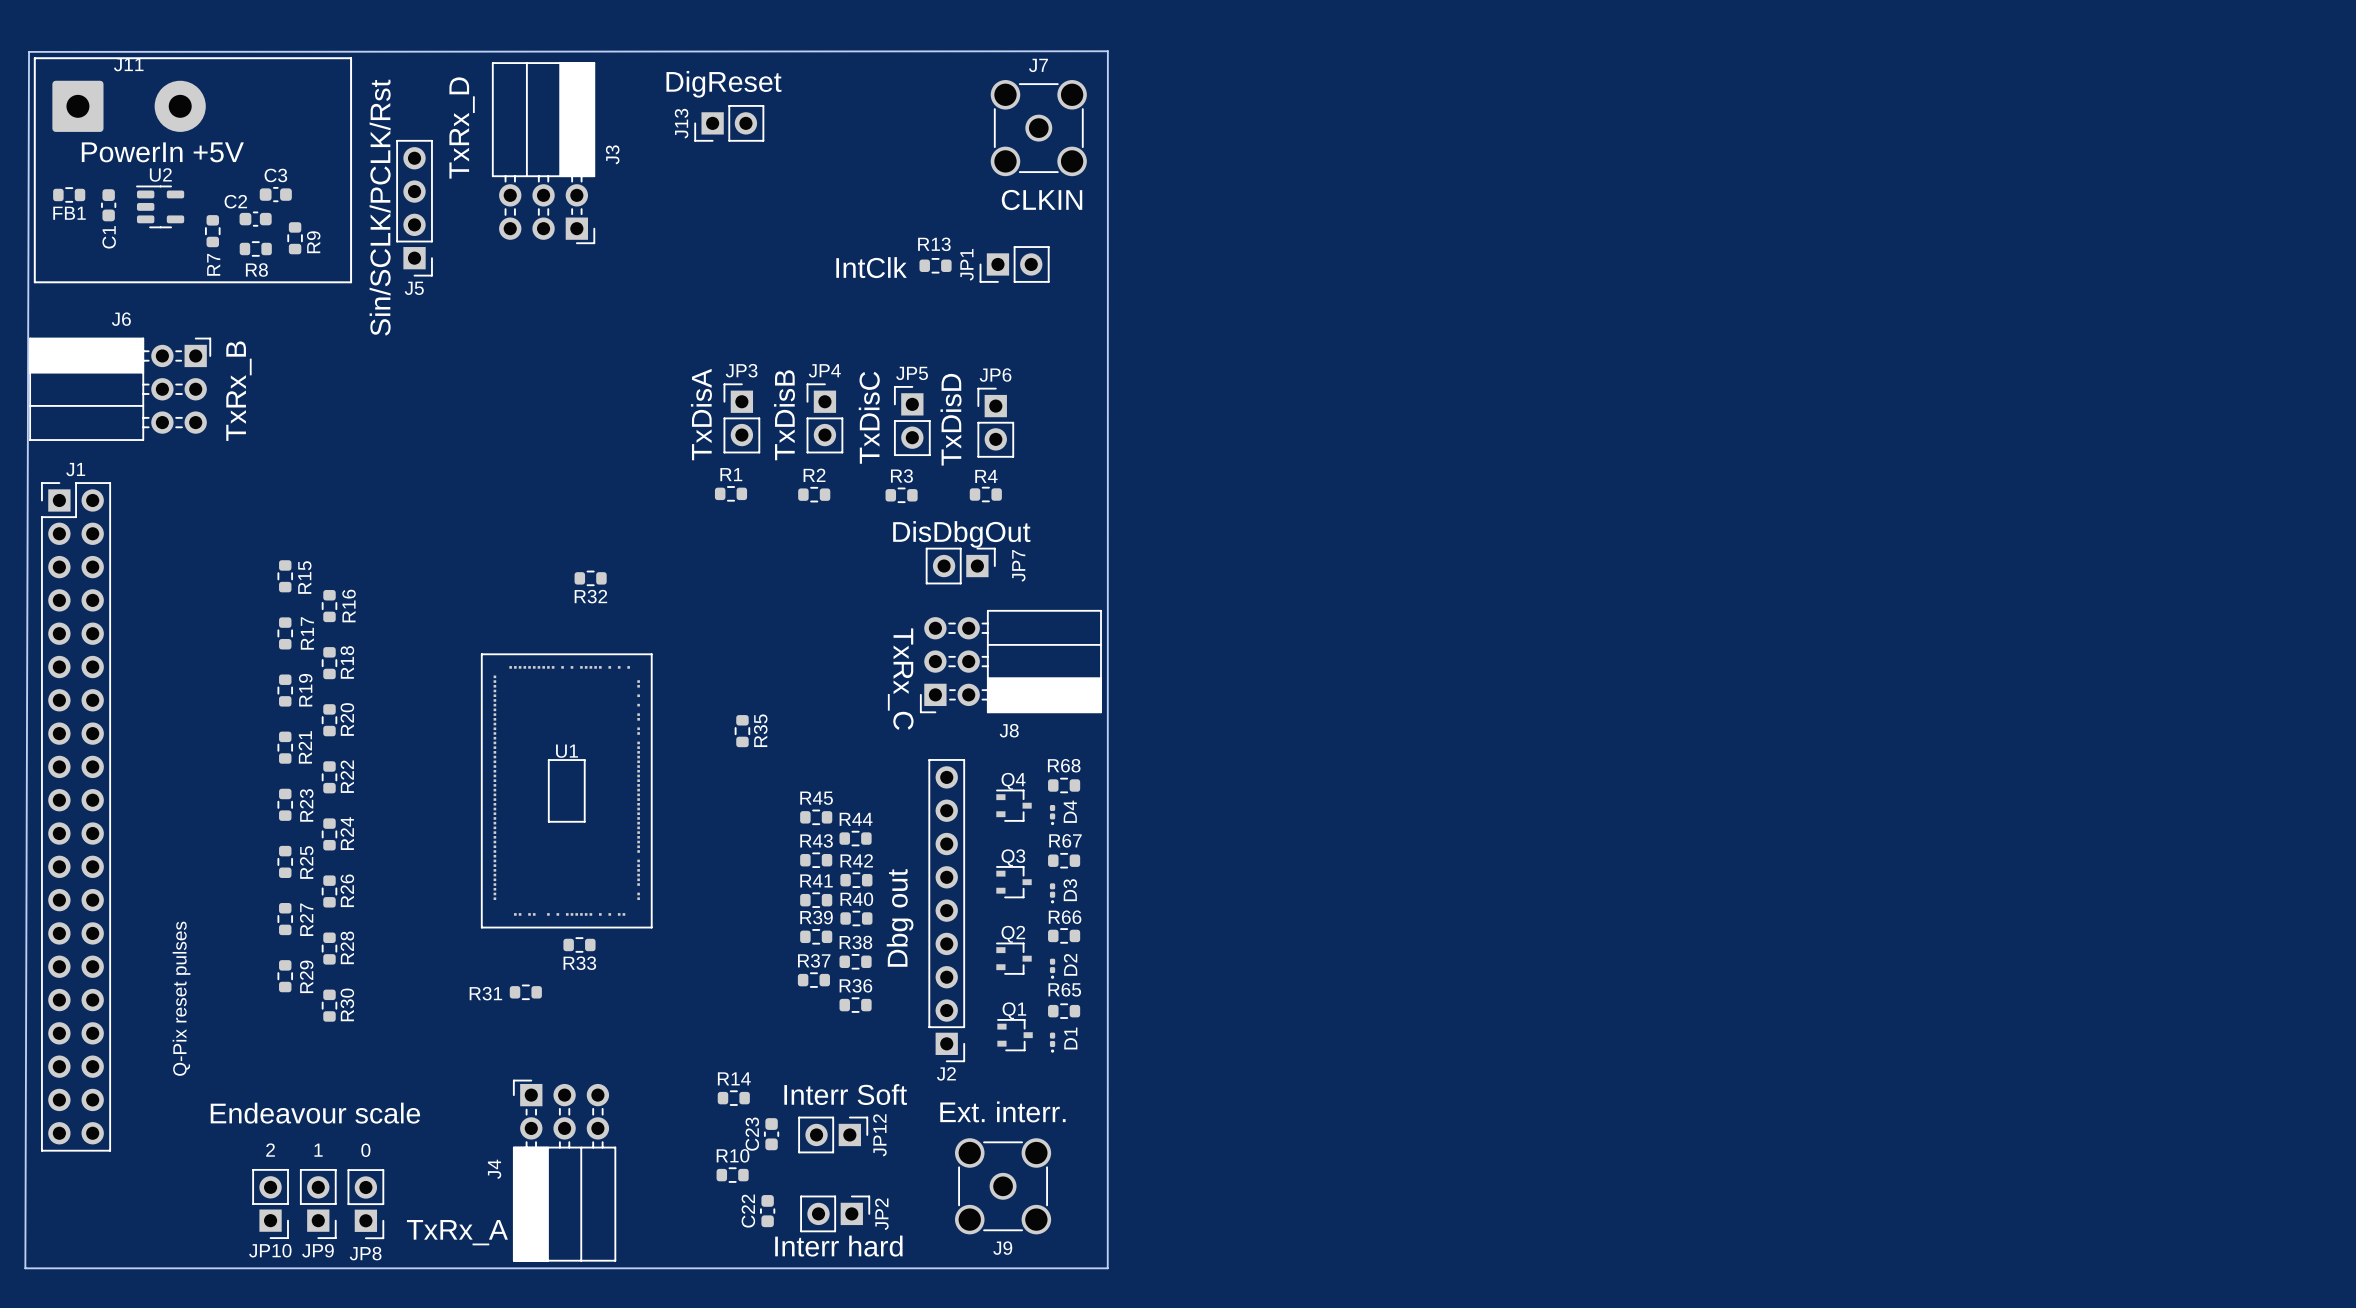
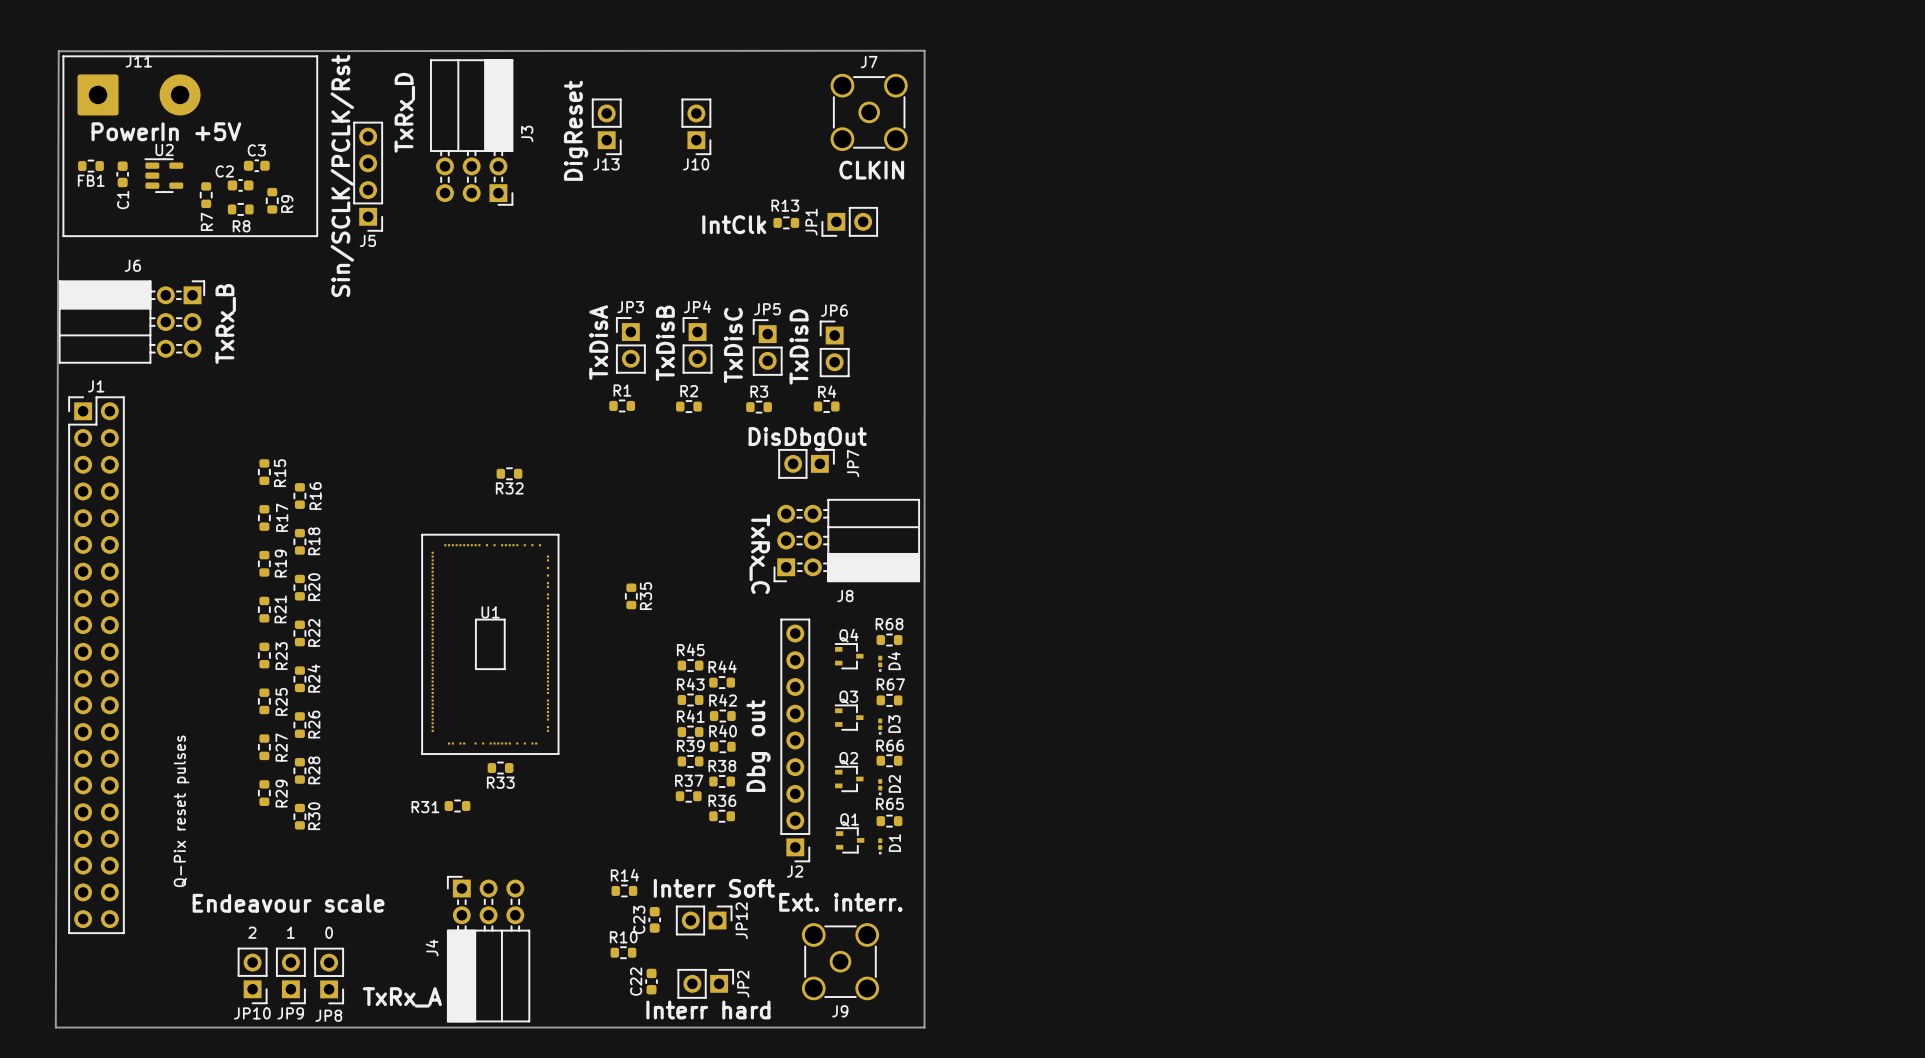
text rotation: 0° (723, 84) -> 90° counterclockwise (576, 130)
J13 rotation: 0° (729, 123) -> 90° counterclockwise (606, 126)
J10: none -> (696, 126)

